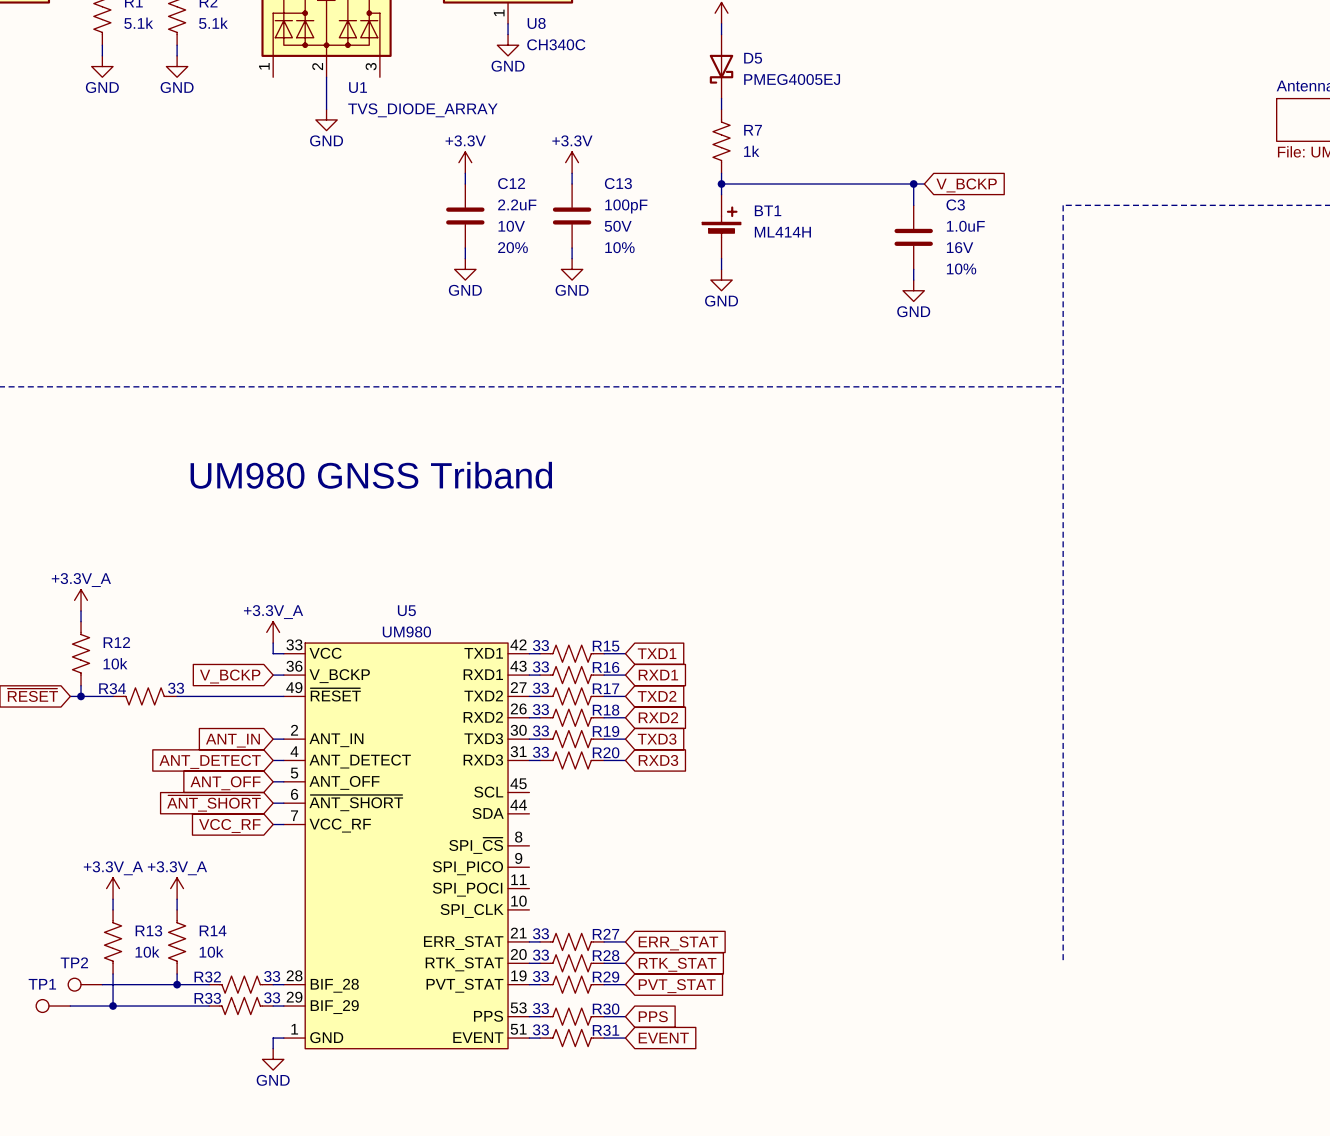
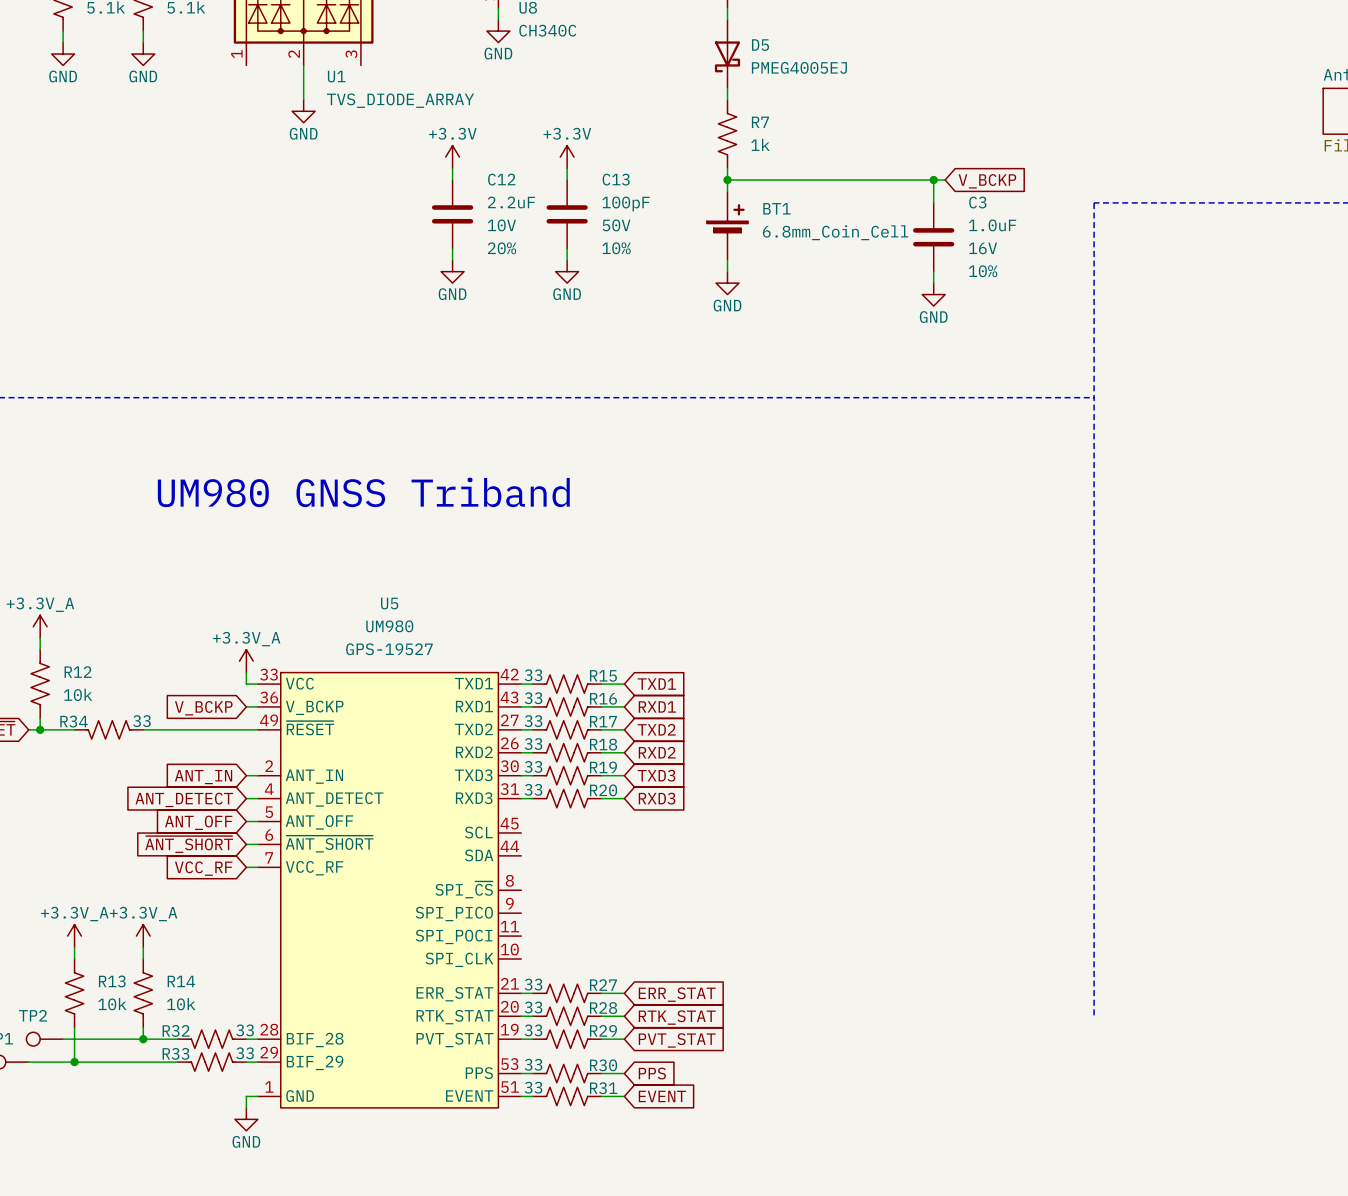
BT1 value: ML414H (782, 232) -> 6.8mm_Coin_Cell (835, 232)
U5 name position: U5 (406, 610) -> U5 (389, 603)
U5 text: none -> GPS-19527 (389, 649)
U5 value position: UM980 (406, 631) -> UM980 (389, 626)

